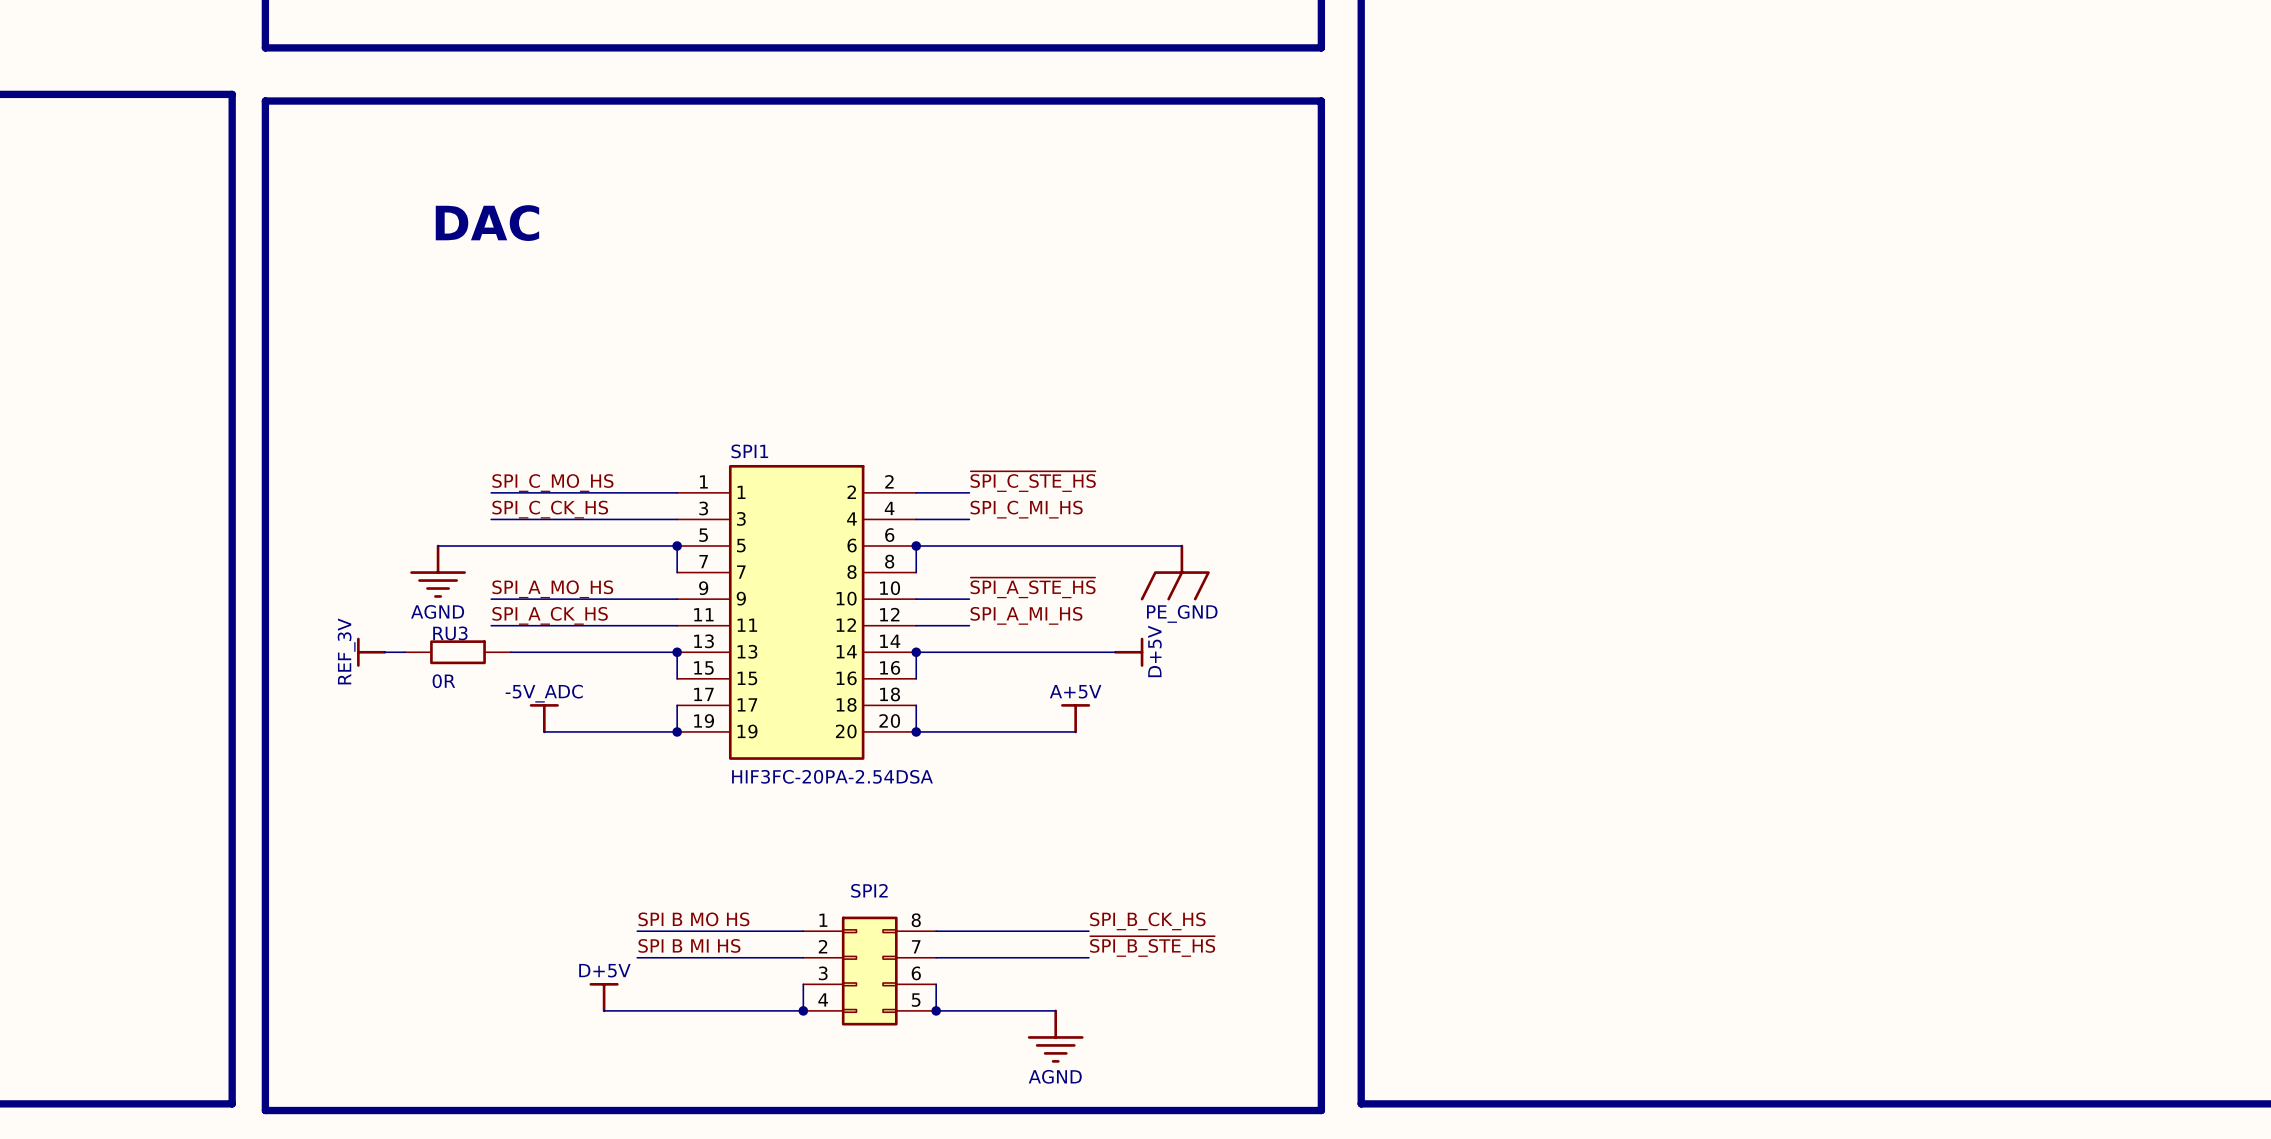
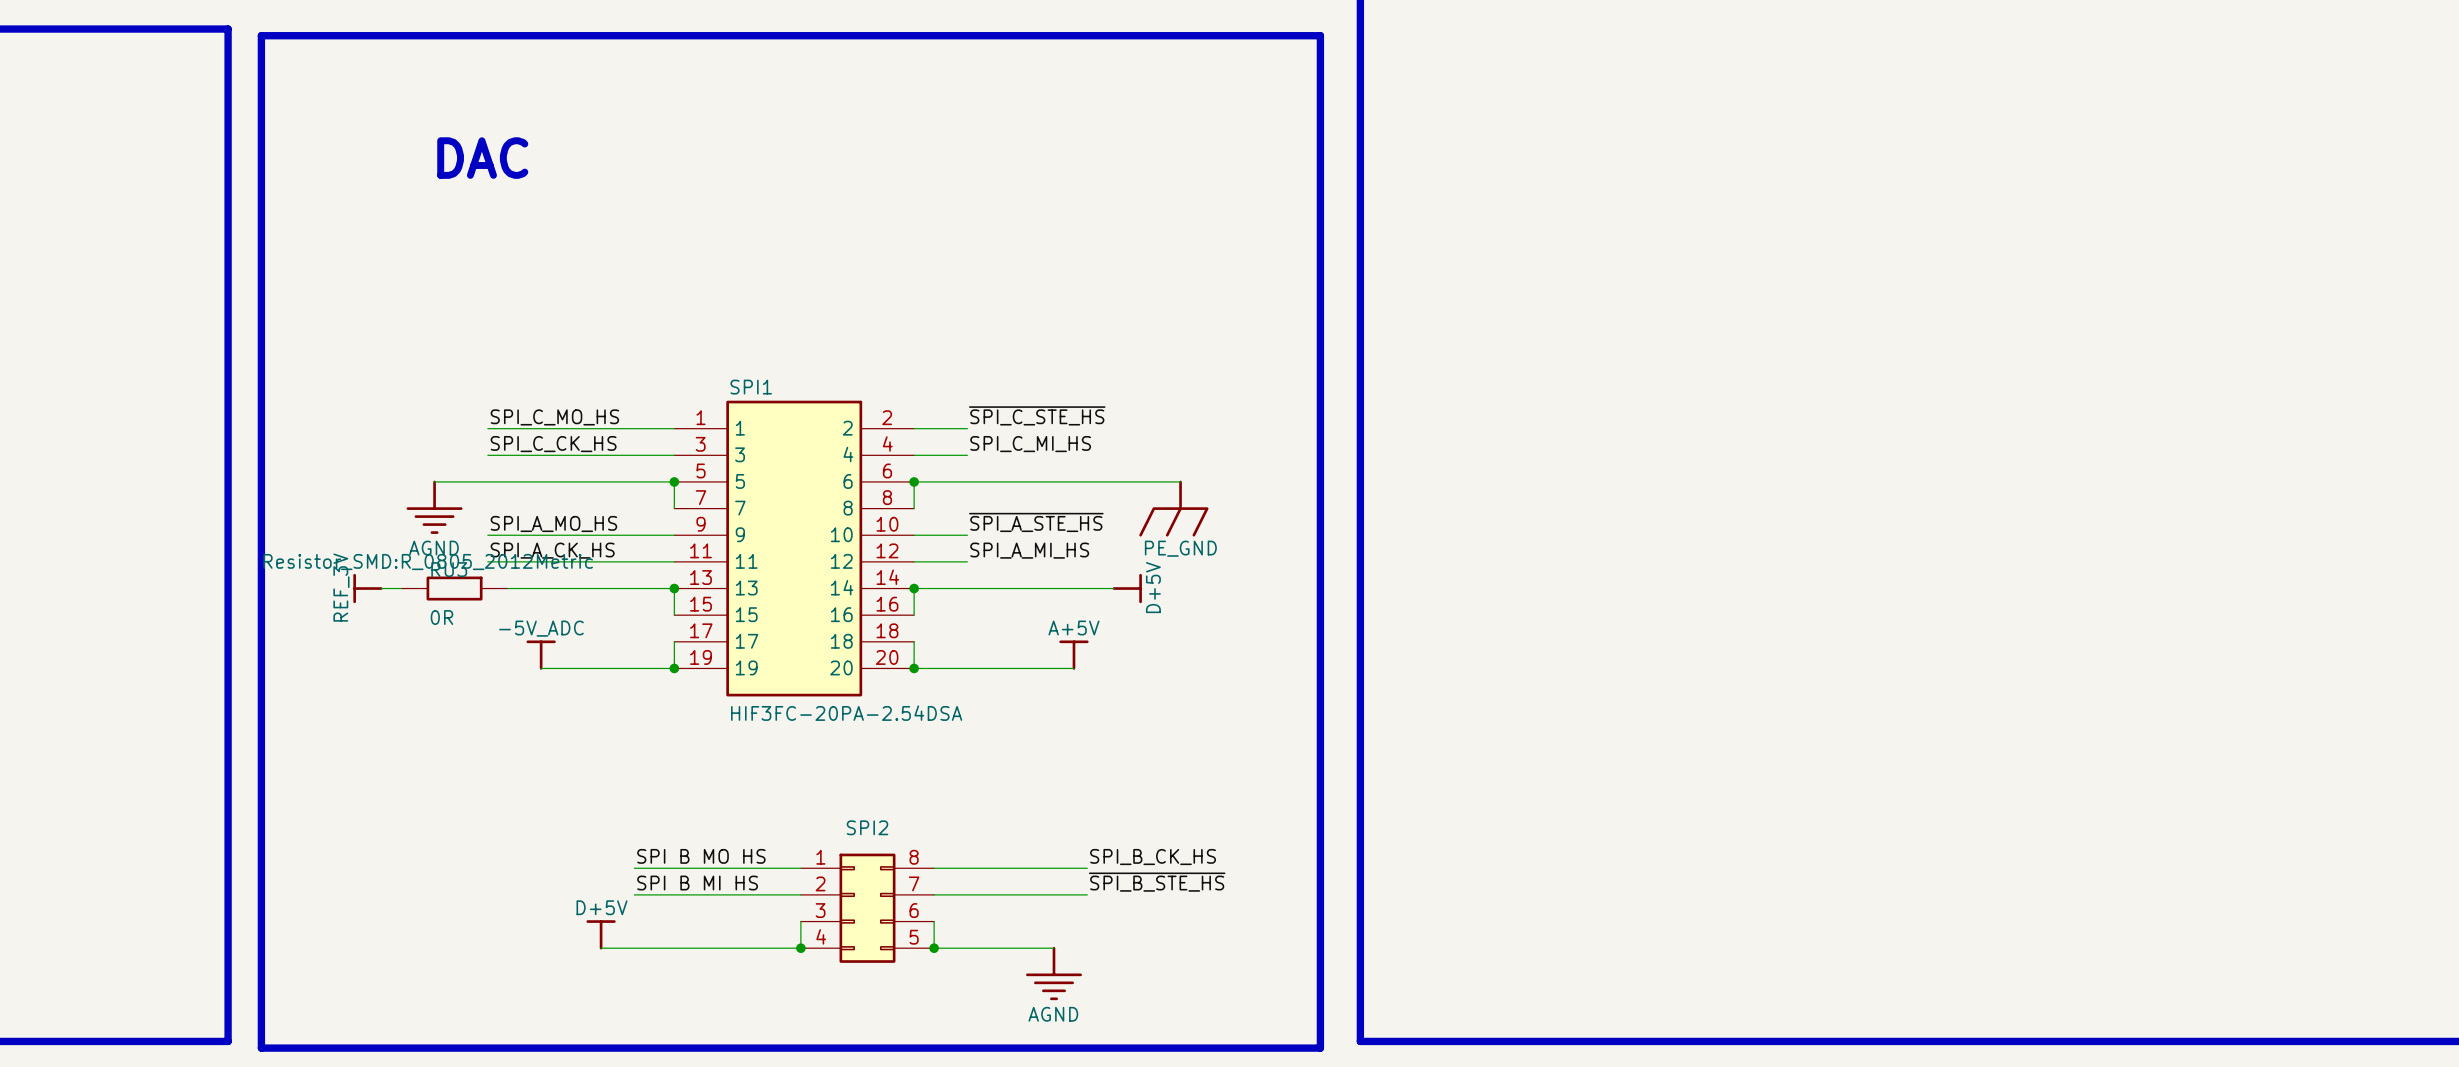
RU3 text: none -> Resistor_SMD:R_0805_2012Metric (428, 562)

